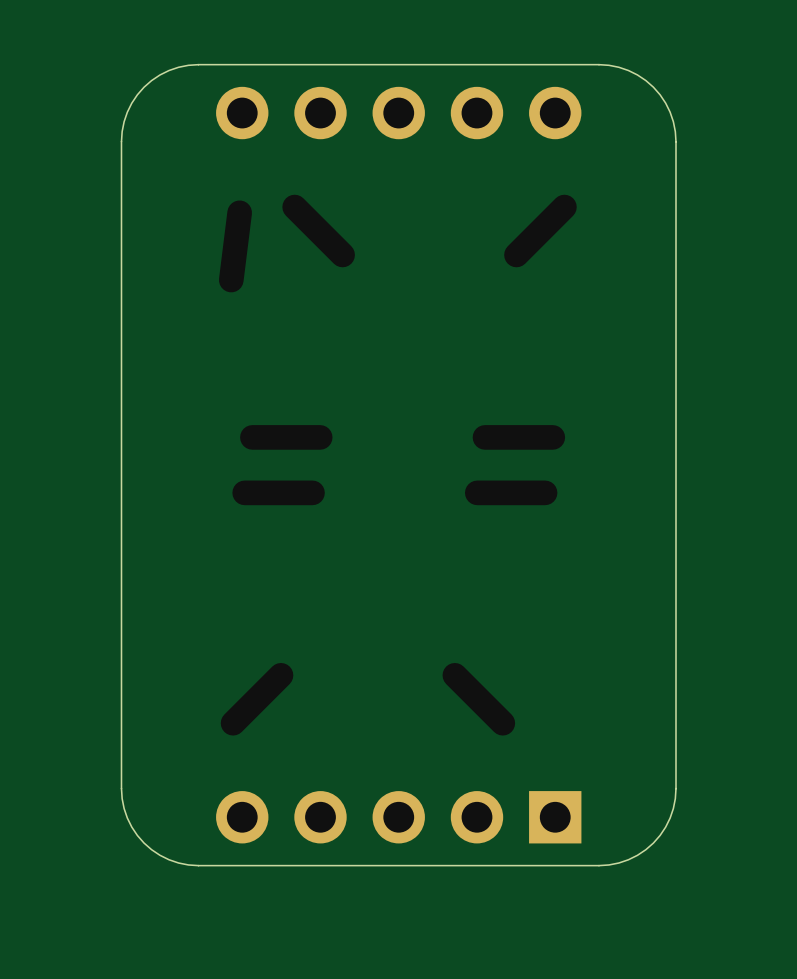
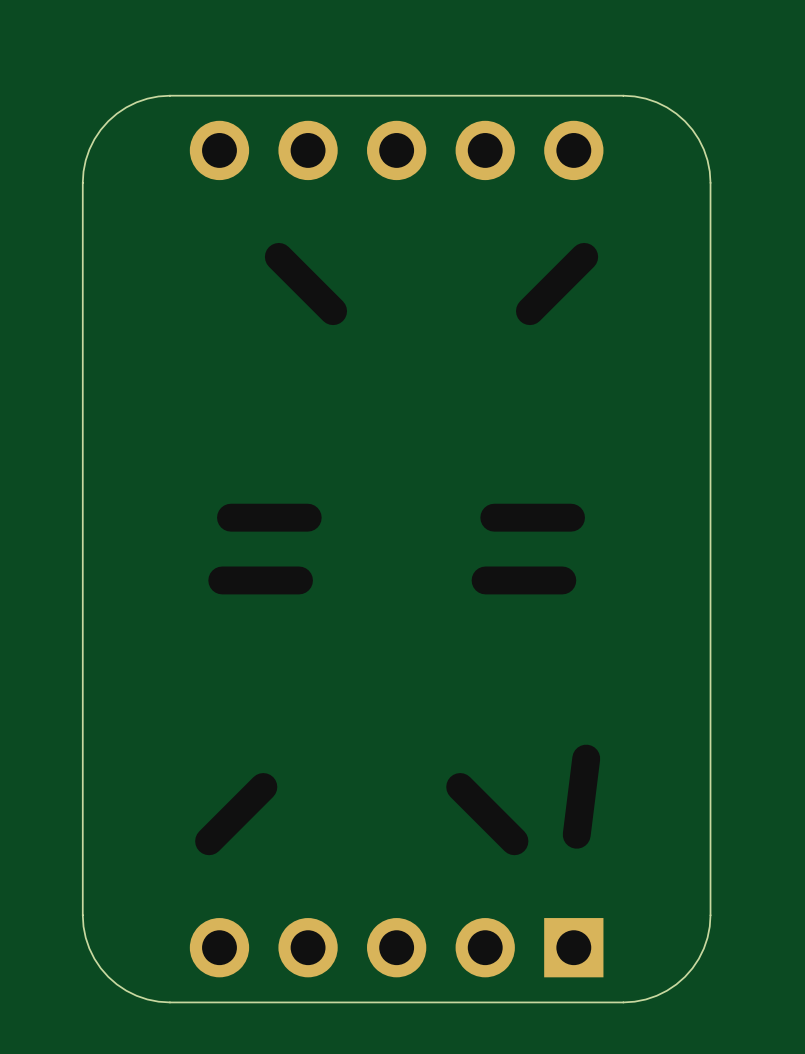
part position: (235, 246) -> (581, 796)

